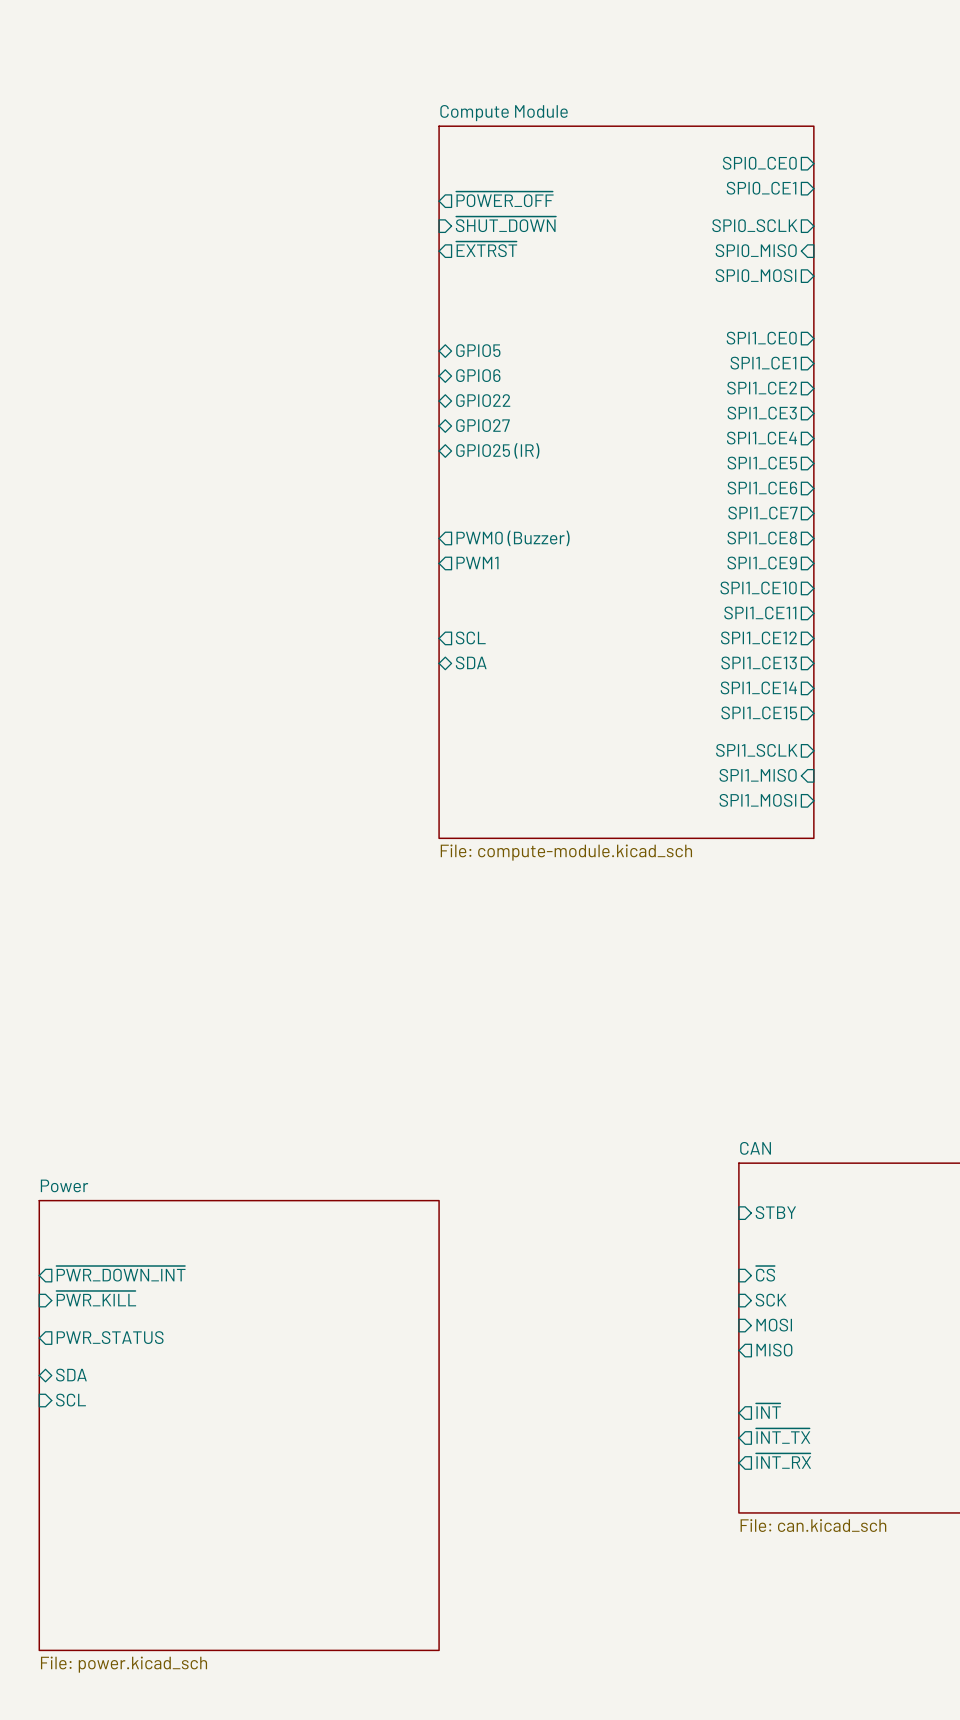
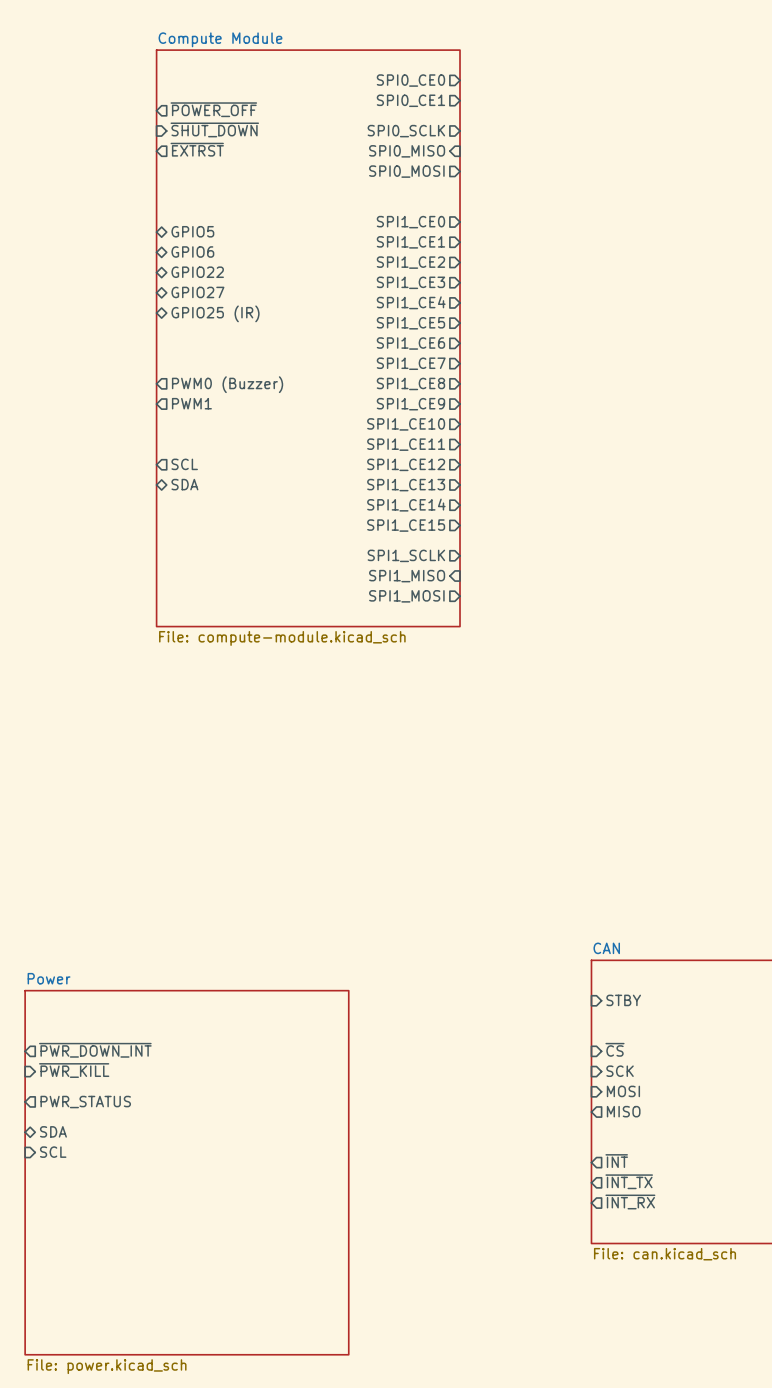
sheet pin: none -> SPI0_CE0 (410, 80)
sheet pin: none -> SPI0_CE1 (410, 100)
sheet pin: none -> ~{POWER_OFF} (213, 109)
sheet pin: none -> ~{SHUT_DOWN} (214, 129)
sheet pin: none -> SPI0_SCLK (406, 131)
sheet pin: none -> ~{EXTRST} (197, 149)
sheet pin: none -> SPI0_MISO (407, 151)
sheet pin: SPI0_CE0 (759, 163) -> none
sheet pin: none -> SPI0_MOSI (406, 171)
sheet pin: SPI0_CE1 (761, 188) -> none
sheet pin: ~{POWER_OFF} (504, 199) -> none
sheet pin: ~{SHUT_DOWN} (505, 224) -> none
sheet pin: SPI0_SCLK (754, 225) -> none
sheet pin: ~{EXTRST} (486, 249) -> none
sheet pin: none -> SPI1_CE0 (410, 222)
sheet pin: SPI0_MISO (756, 250) -> none
sheet pin: none -> GPIO5 (192, 231)
sheet pin: none -> SPI1_CE1 (410, 242)
sheet pin: SPI0_MOSI (756, 275) -> none
sheet pin: none -> GPIO6 (192, 251)
sheet pin: none -> SPI1_CE2 (410, 262)
sheet pin: none -> GPIO22 (197, 272)
sheet pin: none -> SPI1_CE3 (410, 282)
sheet pin: none -> GPIO27 (197, 292)
sheet pin: SPI1_CE0 (761, 338) -> none
sheet pin: GPIO5 (478, 350) -> none
sheet pin: none -> SPI1_CE4 (411, 302)
sheet pin: none -> GPIO25 (IR) (215, 313)
sheet pin: SPI1_CE1 (763, 363) -> none
sheet pin: GPIO6 (478, 375) -> none
sheet pin: none -> SPI1_CE5 (410, 323)
sheet pin: SPI1_CE2 (762, 388) -> none
sheet Compute Module: none -> File: compute-module.kicad_sch (308, 338)
sheet pin: GPIO22 (483, 400) -> none
sheet pin: none -> SPI1_CE6 (410, 343)
sheet pin: SPI1_CE3 (762, 413) -> none
sheet pin: GPIO27 (482, 425) -> none
sheet pin: none -> SPI1_CE7 (411, 363)
sheet pin: SPI1_CE4 (761, 438) -> none
sheet pin: none -> PWM0 (Buzzer) (227, 384)
sheet pin: GPIO25 (IR) (497, 450) -> none
sheet pin: none -> SPI1_CE8 (410, 383)
sheet pin: SPI1_CE5 (762, 463) -> none
sheet pin: none -> PWM1 (191, 403)
sheet pin: none -> SPI1_CE9 (410, 404)
sheet Compute Module: File: compute-module.kicad_sch (626, 482) -> none
sheet pin: SPI1_CE6 (762, 488) -> none
sheet pin: none -> SPI1_CE10 (406, 424)
sheet pin: SPI1_CE7 (762, 513) -> none
sheet pin: none -> SPI1_CE11 (406, 444)
sheet pin: PWM0 (Buzzer) (513, 538) -> none
sheet pin: SPI1_CE8 (762, 538) -> none
sheet pin: none -> SCL (184, 464)
sheet pin: none -> SPI1_CE12 (406, 464)
sheet pin: PWM1 (477, 562) -> none
sheet pin: SPI1_CE9 (762, 563) -> none
sheet pin: none -> SDA (184, 484)
sheet pin: none -> SPI1_CE13 (406, 485)
sheet pin: SPI1_CE10 (758, 587) -> none
sheet pin: none -> SPI1_CE14 (406, 505)
sheet pin: SPI1_CE11 (760, 612) -> none
sheet pin: none -> SPI1_CE15 (406, 525)
sheet pin: SCL (470, 637) -> none
sheet pin: SPI1_CE12 (758, 637) -> none
sheet pin: SDA (471, 662) -> none
sheet pin: none -> SPI1_SCLK (406, 555)
sheet pin: SPI1_CE13 (759, 662) -> none
sheet pin: none -> SPI1_MISO (407, 576)
sheet pin: SPI1_CE14 (758, 687) -> none
sheet pin: none -> SPI1_MOSI (406, 596)
sheet pin: SPI1_CE15 (759, 712) -> none
sheet pin: SPI1_SCLK (756, 750) -> none
sheet pin: SPI1_MISO (758, 775) -> none
sheet pin: SPI1_MOSI (757, 800) -> none

